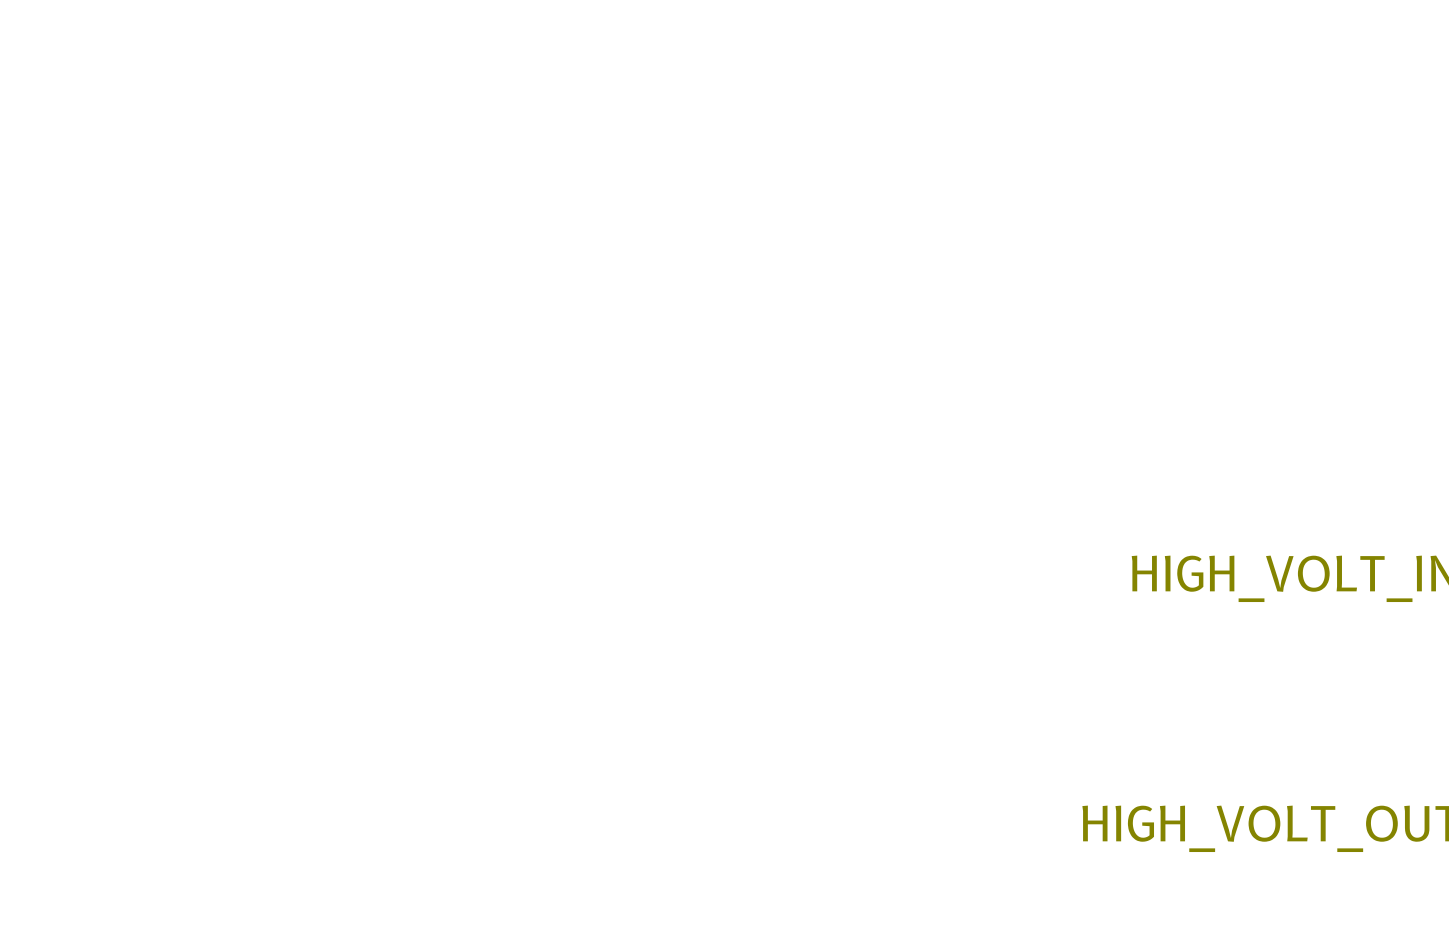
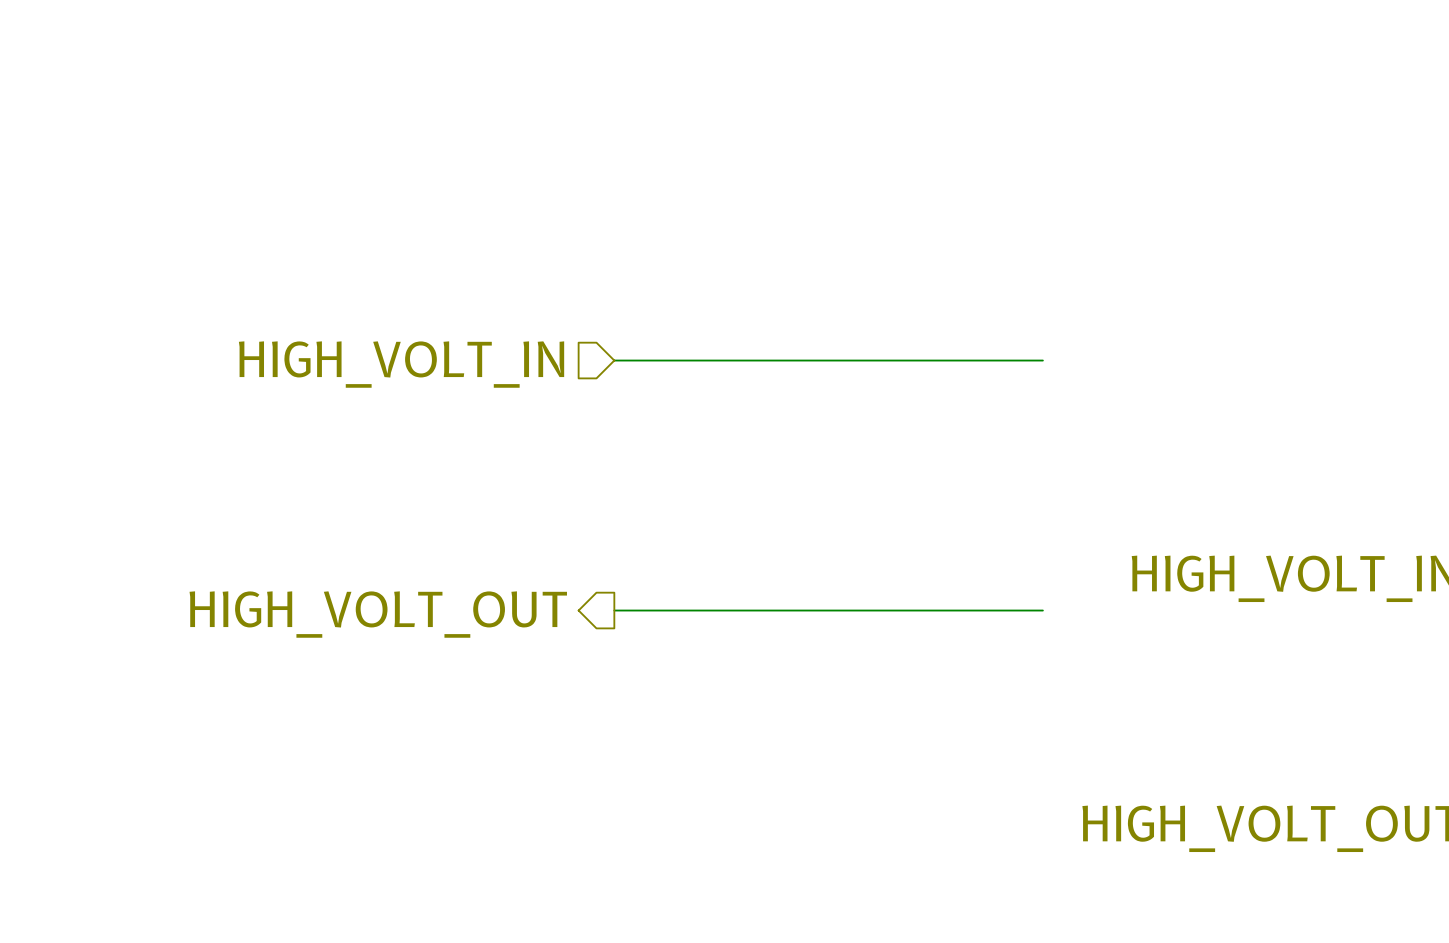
wire: none -> (614, 360) (1042, 360)
hierarchical label: none -> HIGH_VOLT_IN (401, 364)
wire: none -> (614, 610) (1042, 610)
hierarchical label: none -> HIGH_VOLT_OUT (378, 614)

